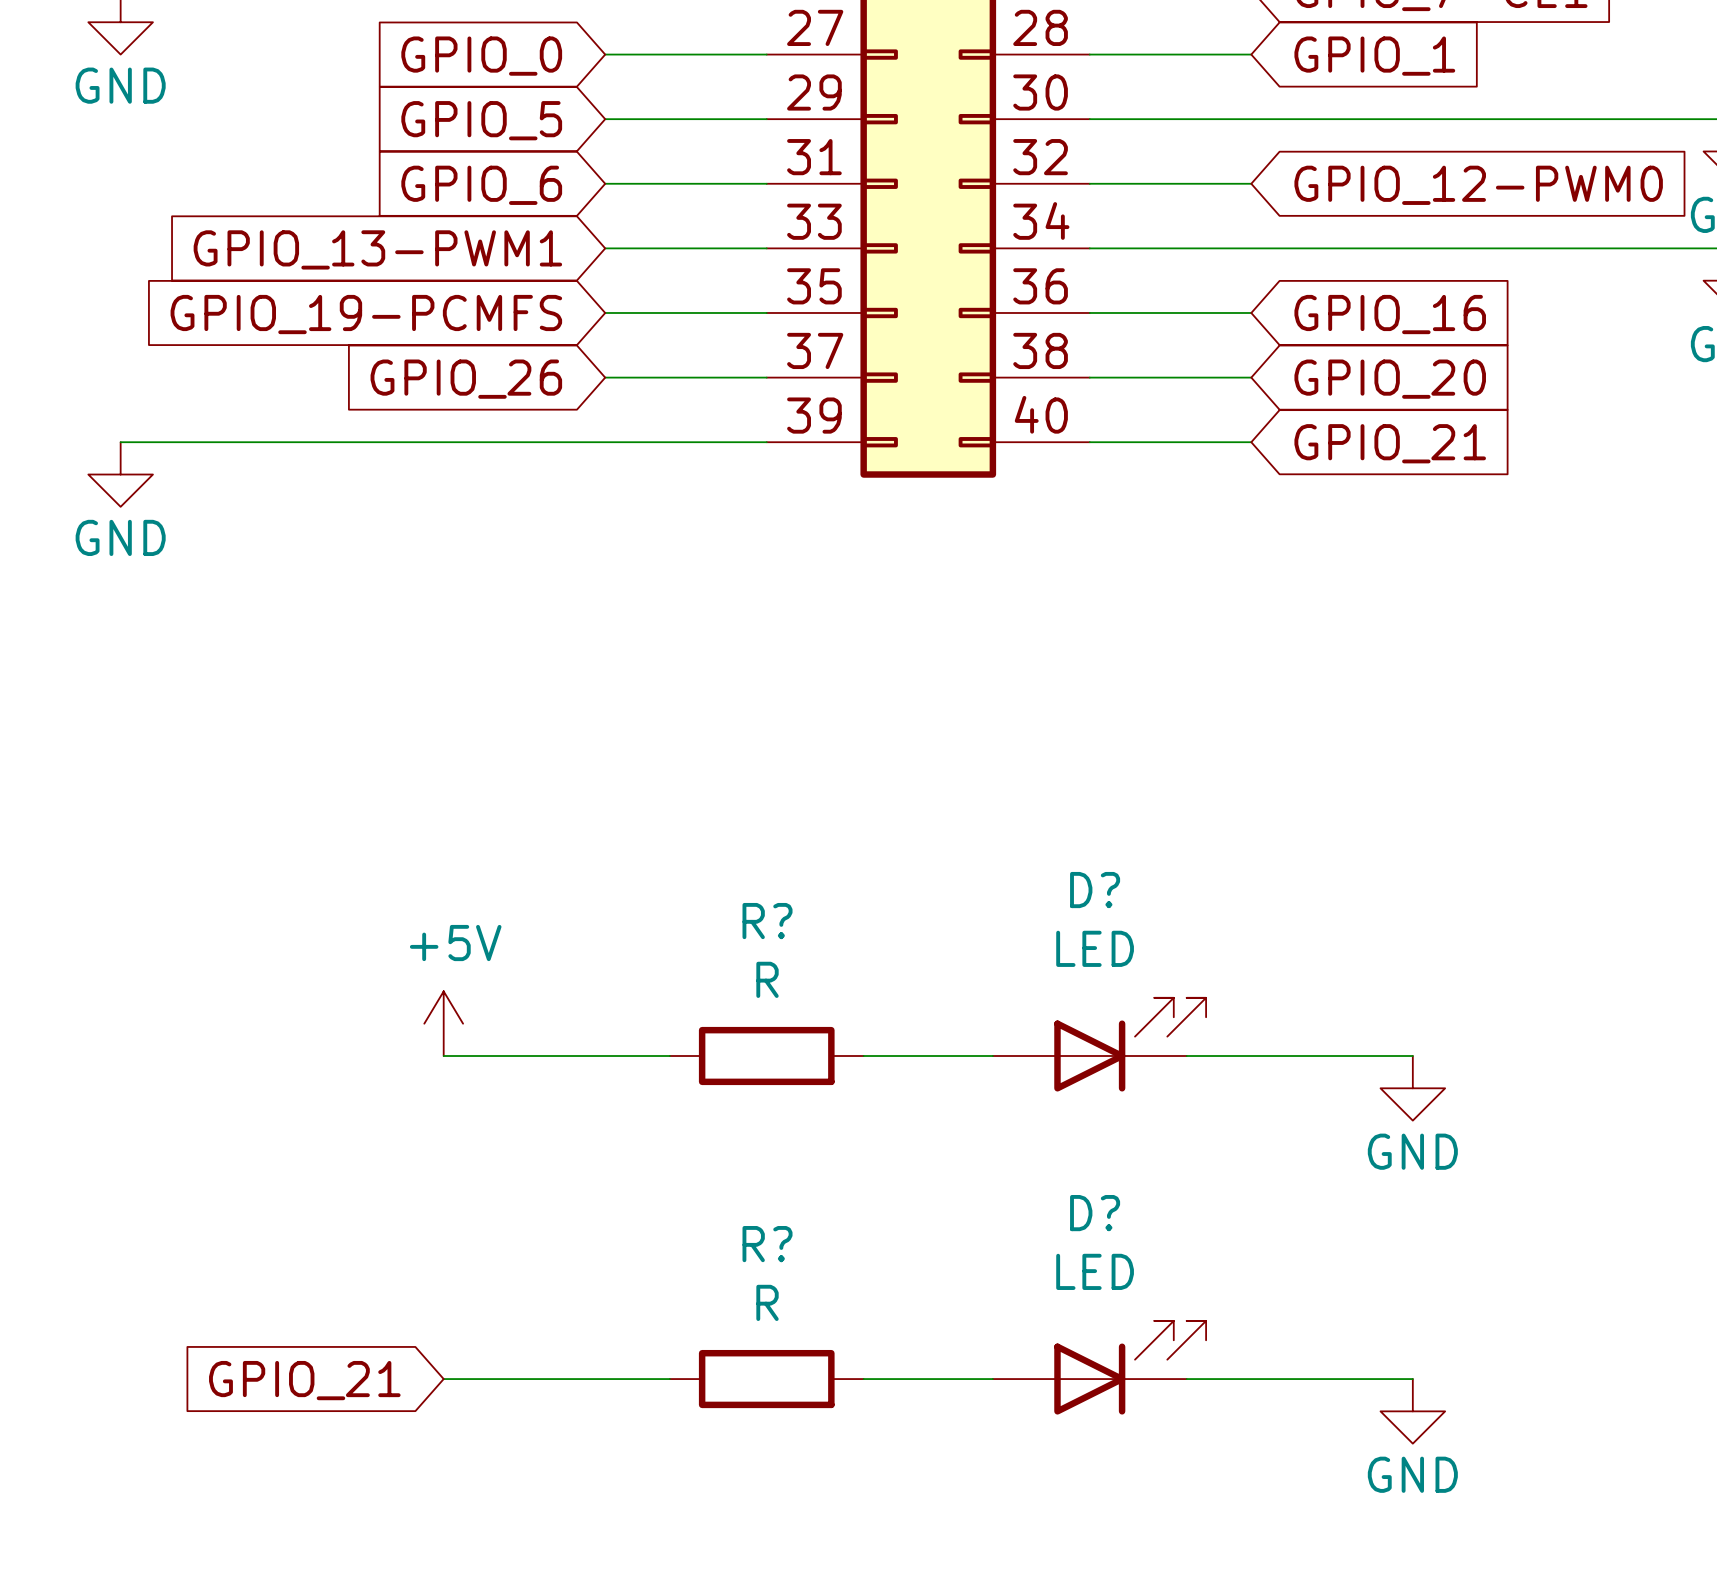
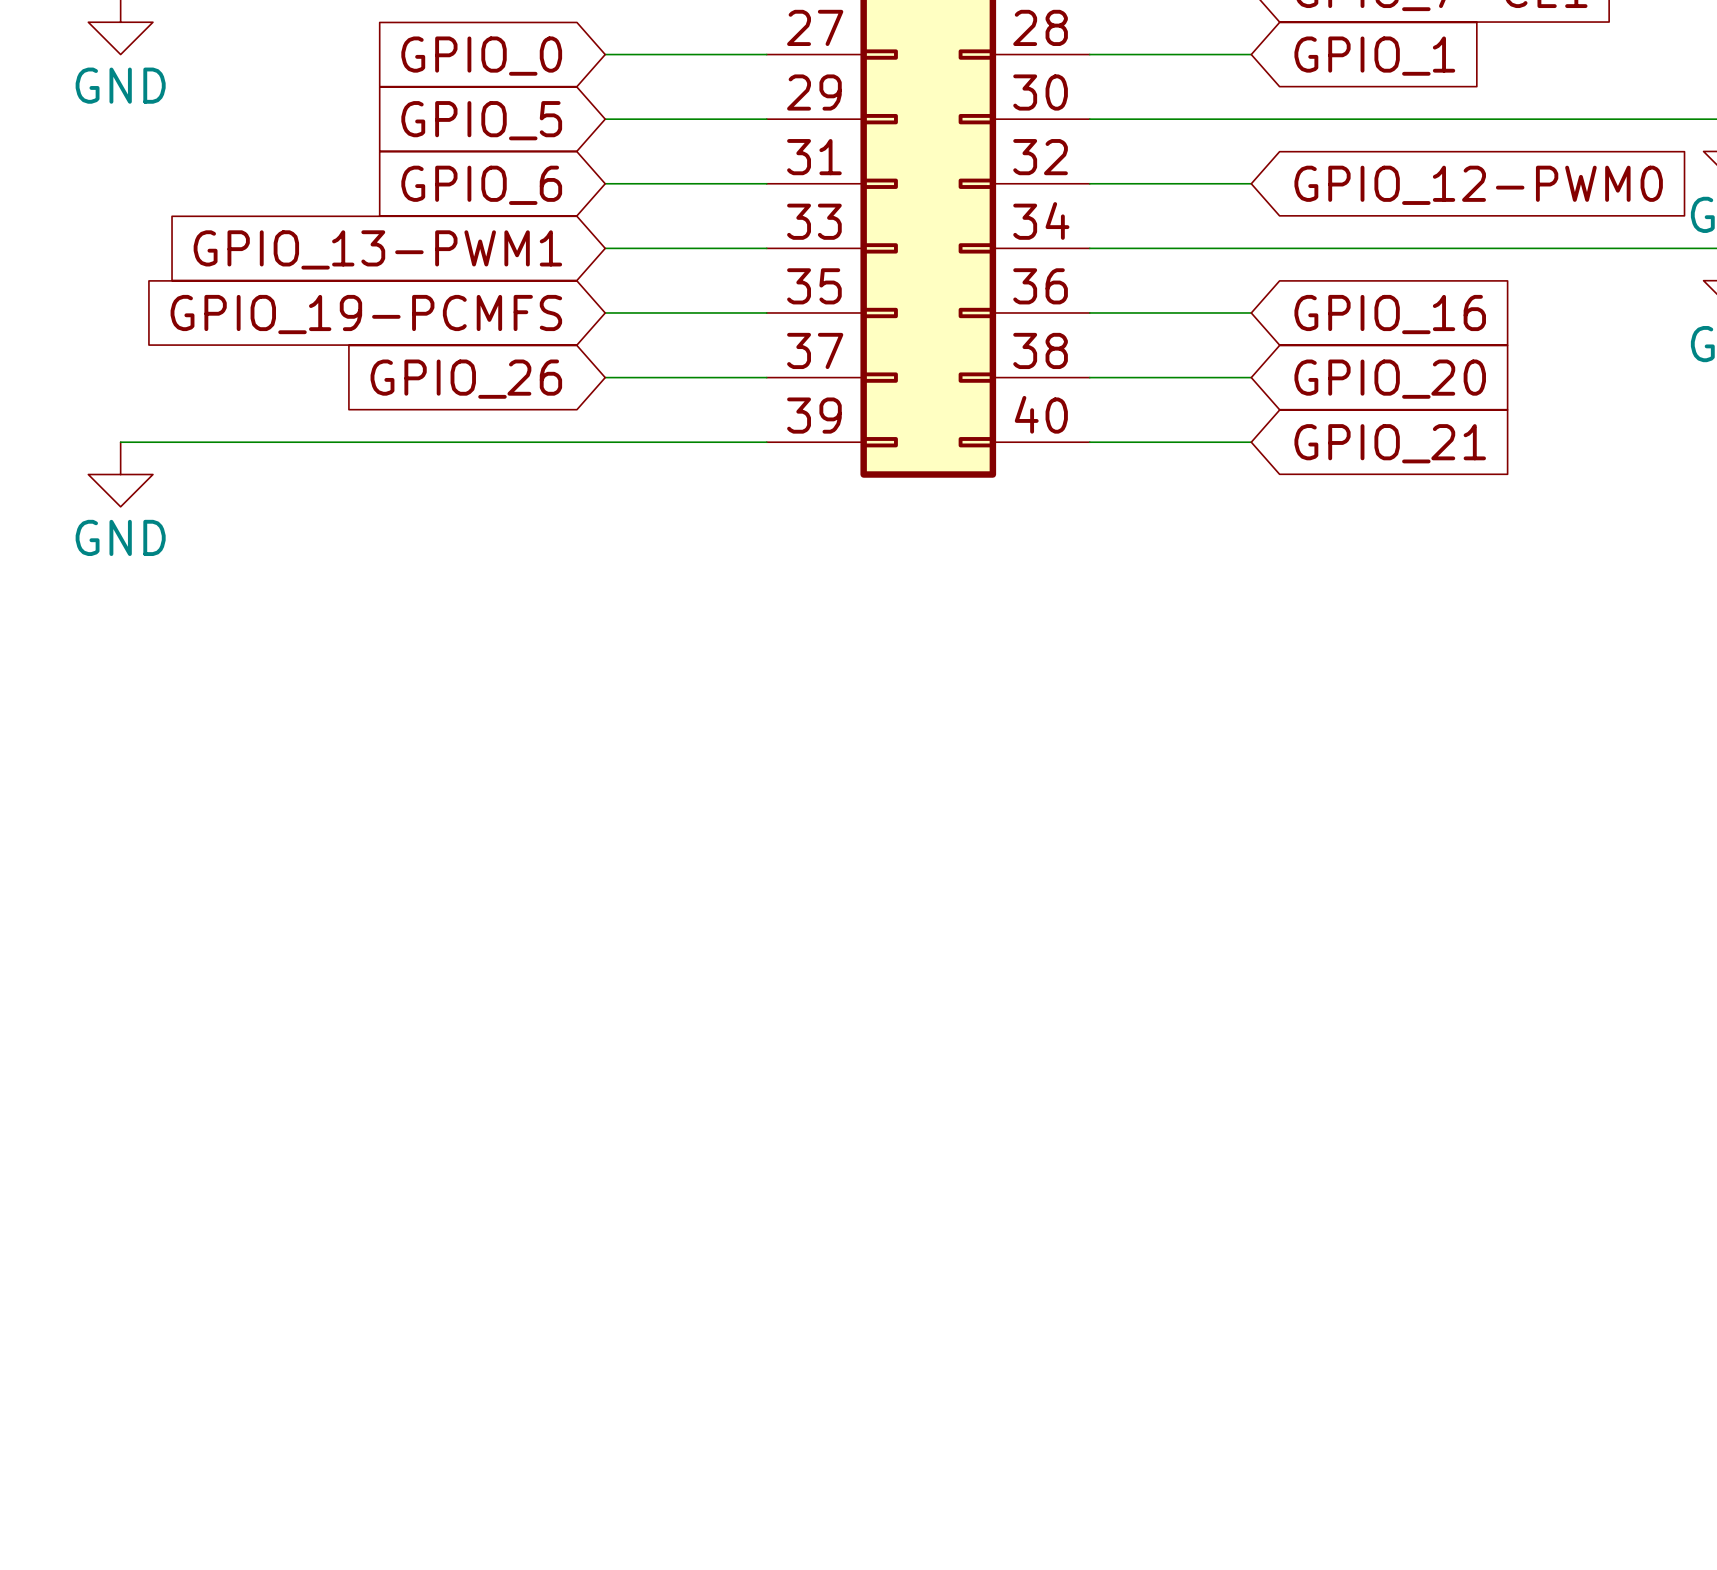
power symbol: +5V (443, 1023) -> none
D?: LED (1099, 1044) -> none
wire: (443, 1056) (669, 1056) -> none
R?: R (766, 1056) -> none
wire: (863, 1056) (992, 1056) -> none
wire: (1186, 1056) (1412, 1056) -> none
power symbol: GND (1412, 1088) -> none
D?: LED (1099, 1367) -> none
wire: (443, 1379) (669, 1379) -> none
R?: R (766, 1379) -> none
wire: (863, 1379) (992, 1379) -> none
wire: (1186, 1379) (1412, 1379) -> none
global label: GPIO_21 (304, 1380) -> none
power symbol: GND (1412, 1411) -> none

